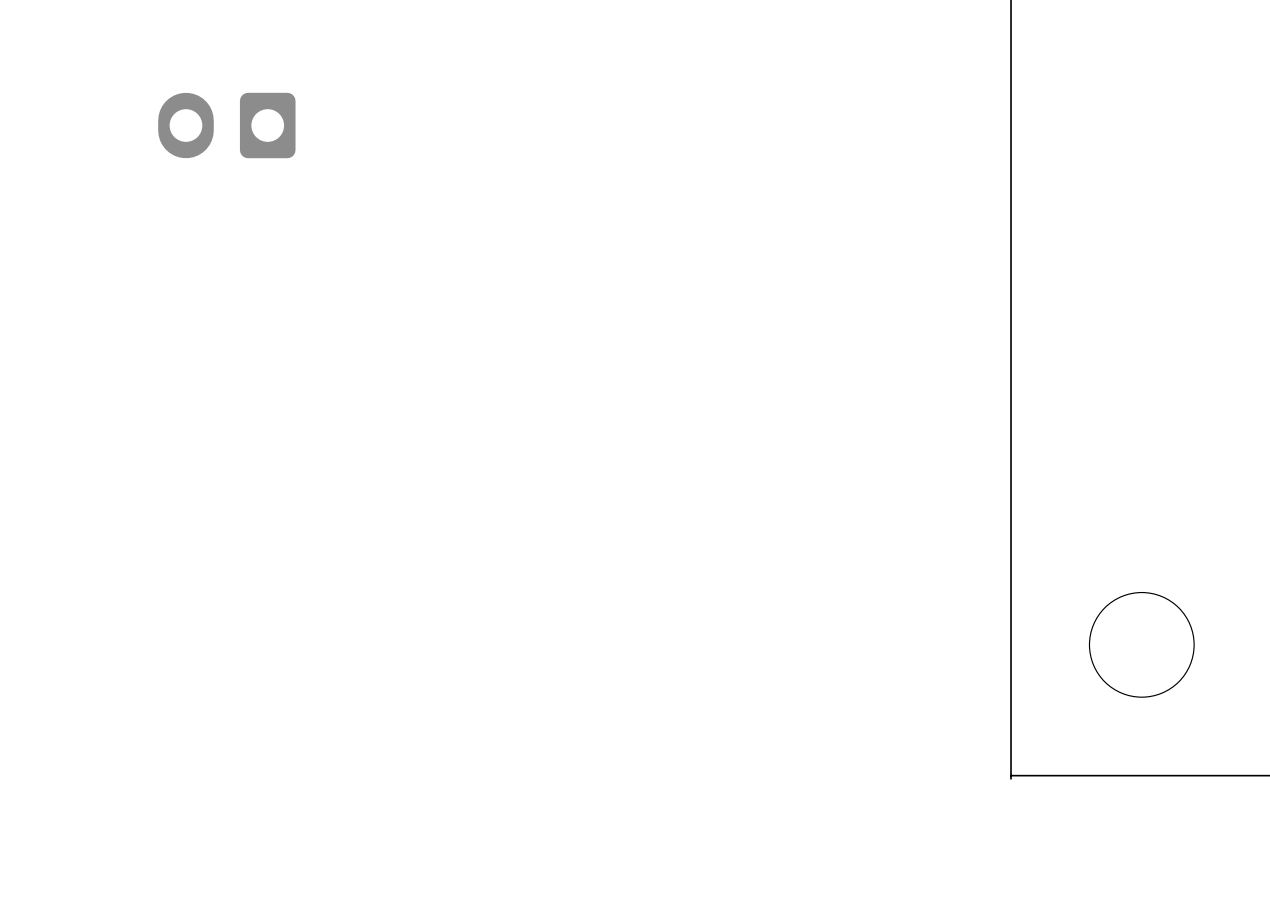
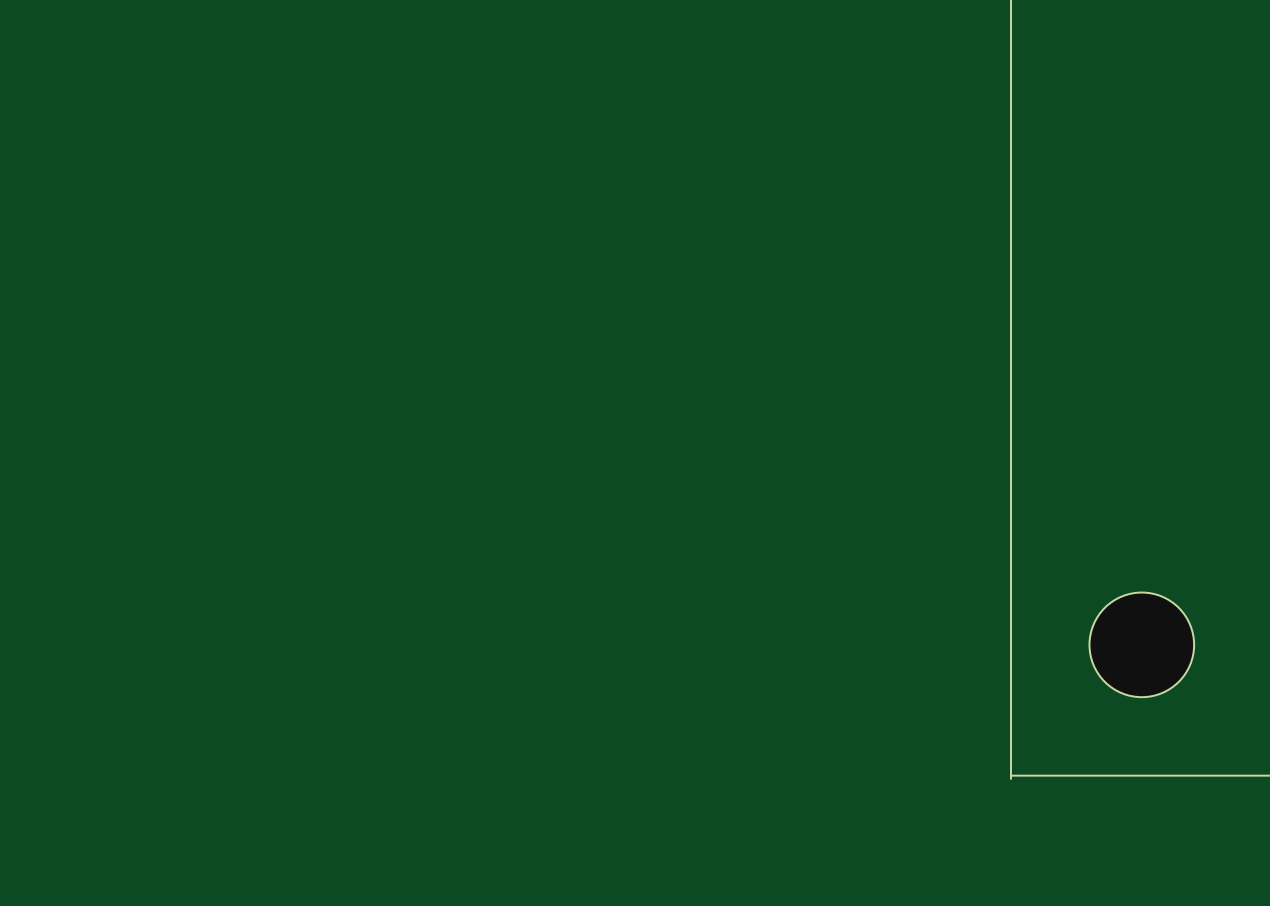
part: (226, 125) -> none

